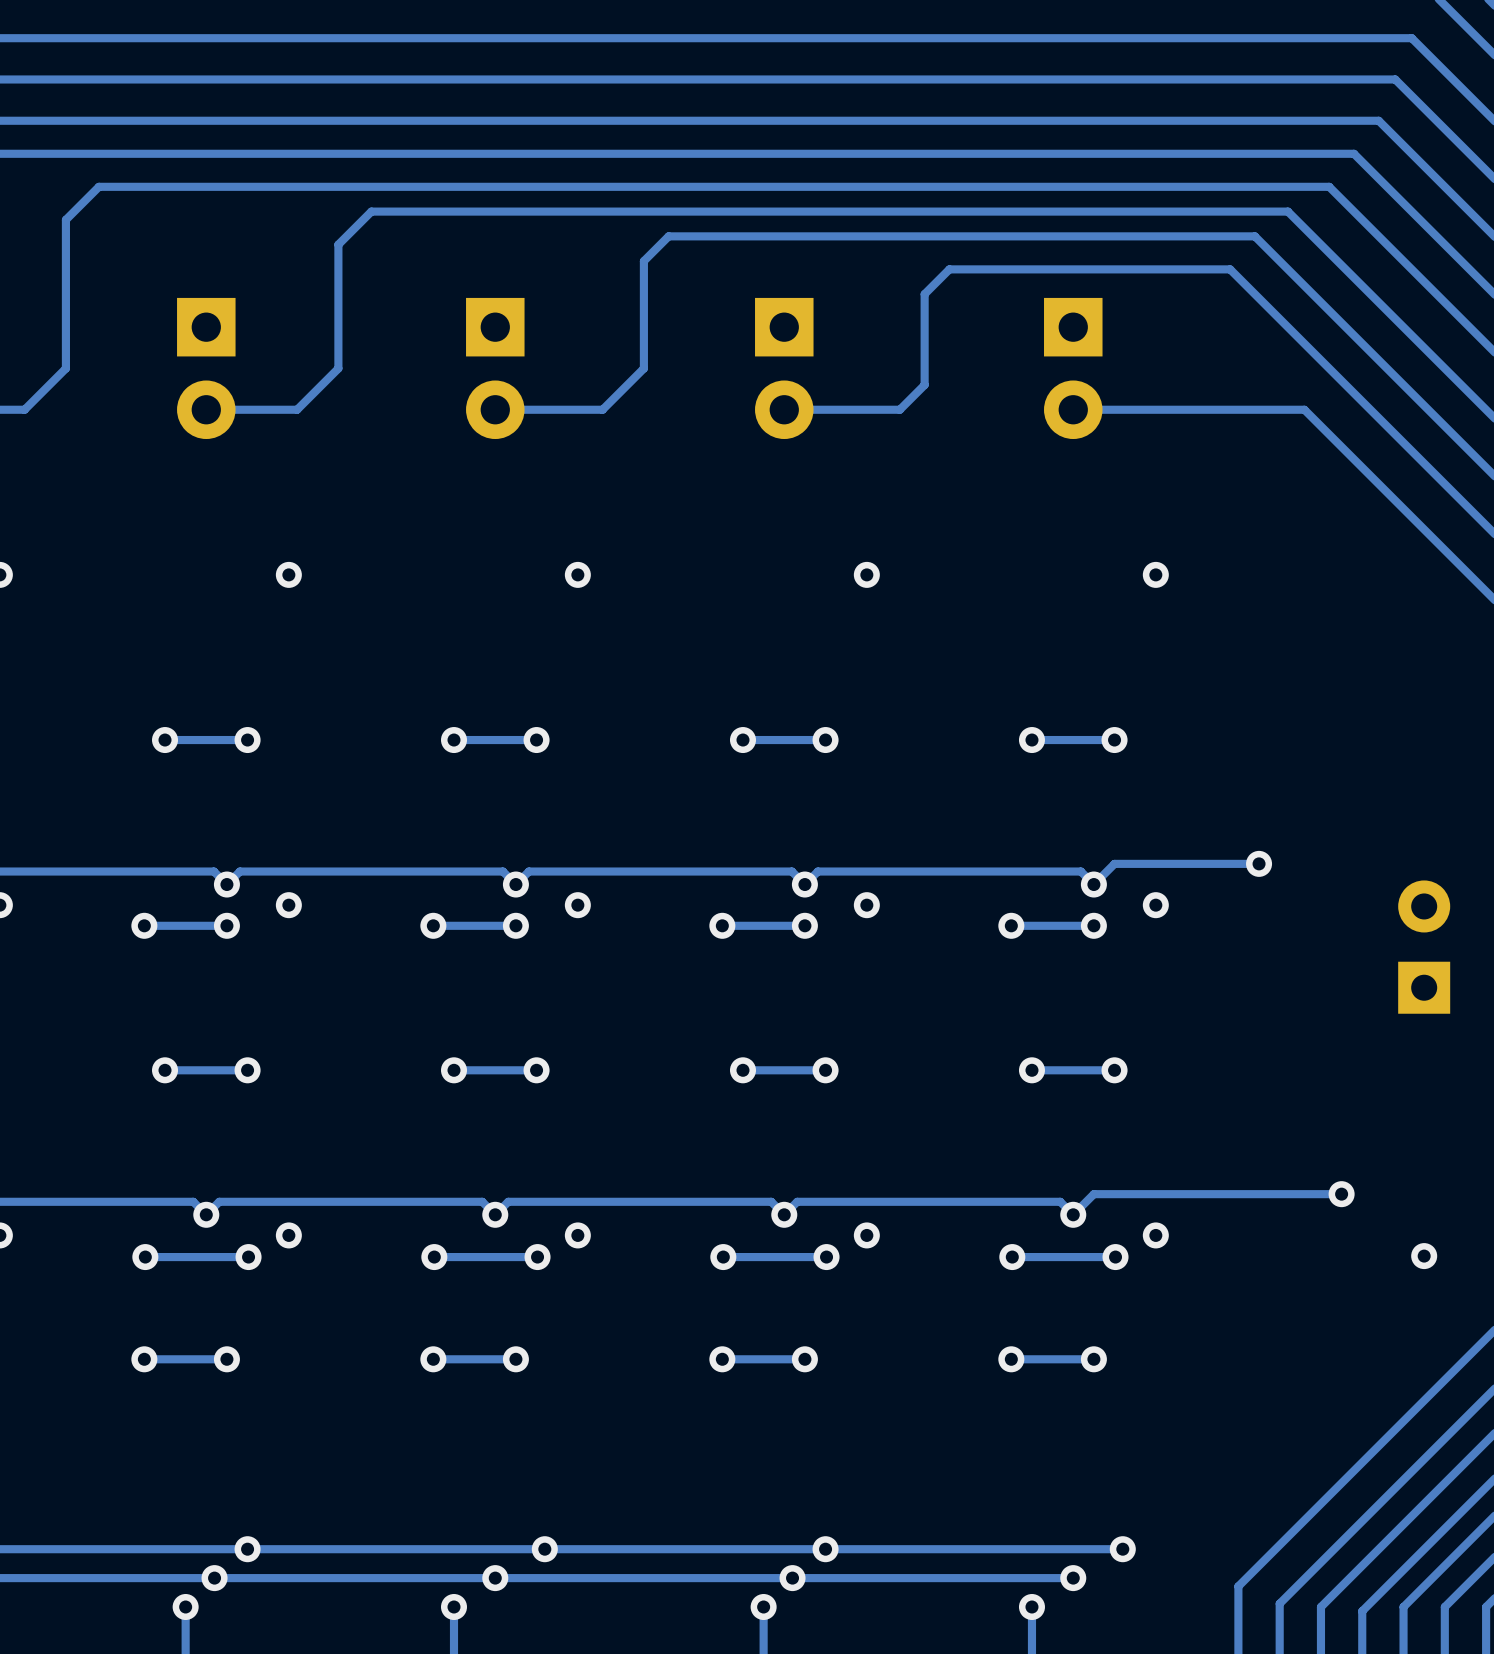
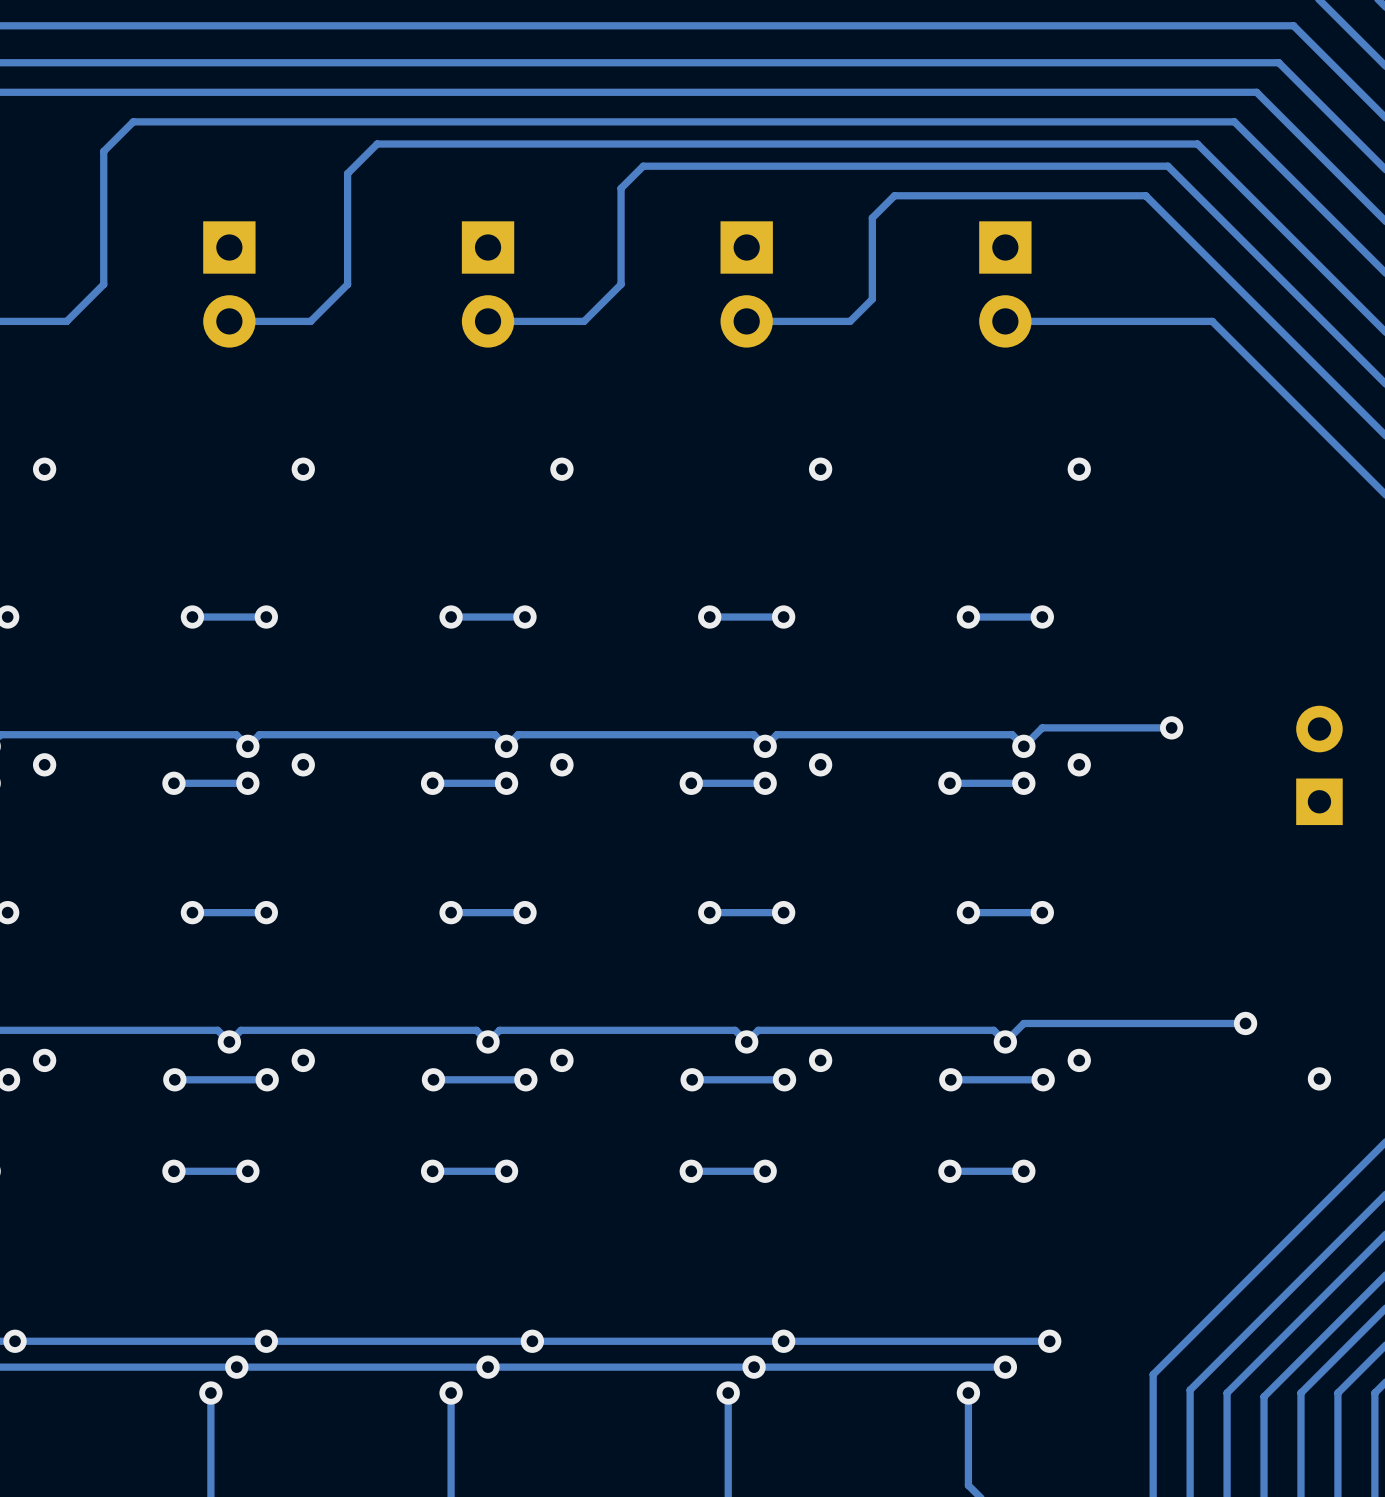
part position: (1424, 947) -> (1319, 765)

